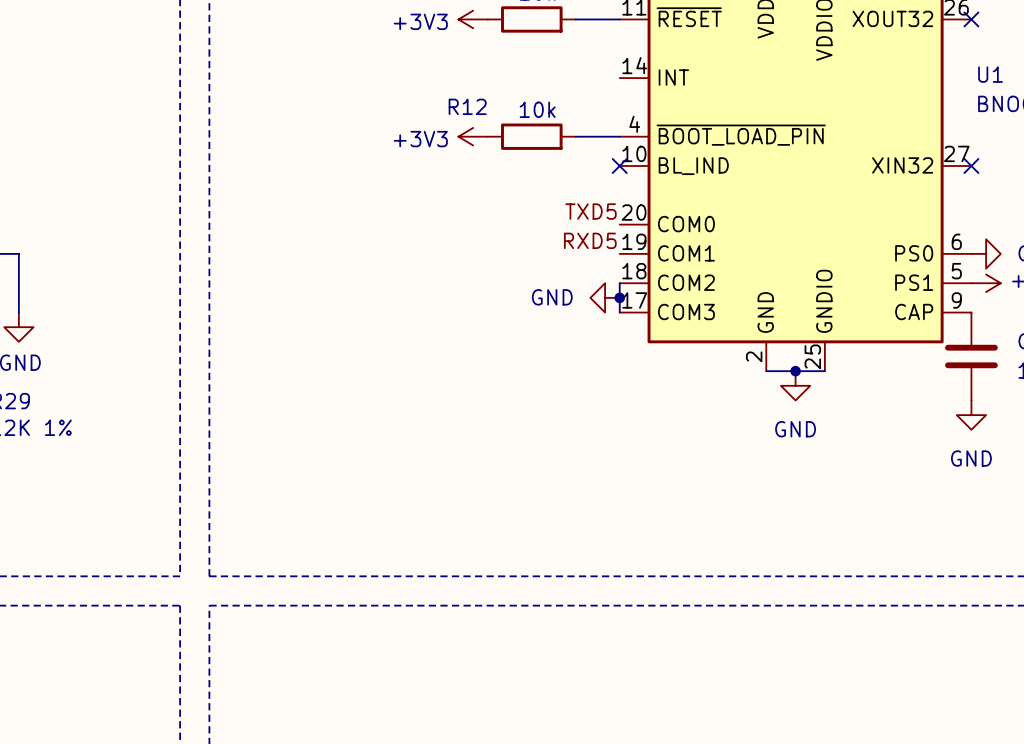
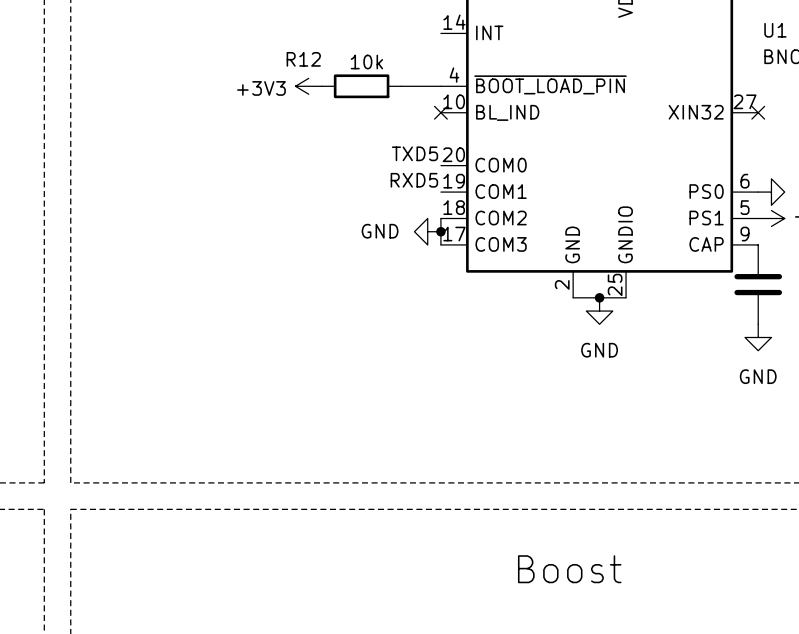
text: none -> Boost (569, 569)

